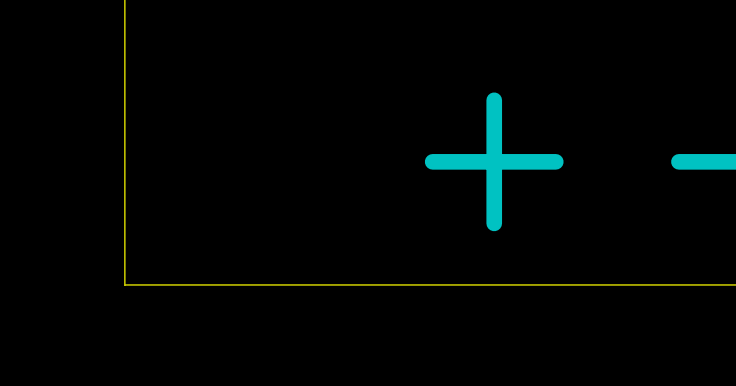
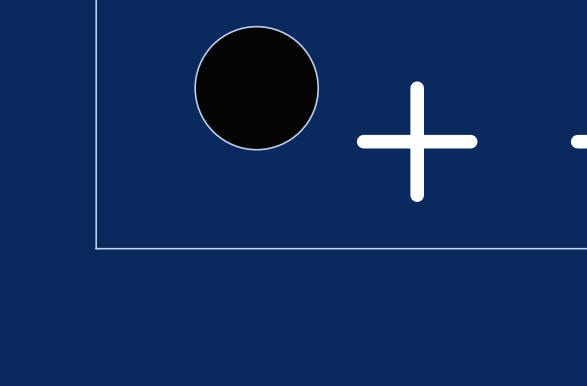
hole: none -> (256, 88)

